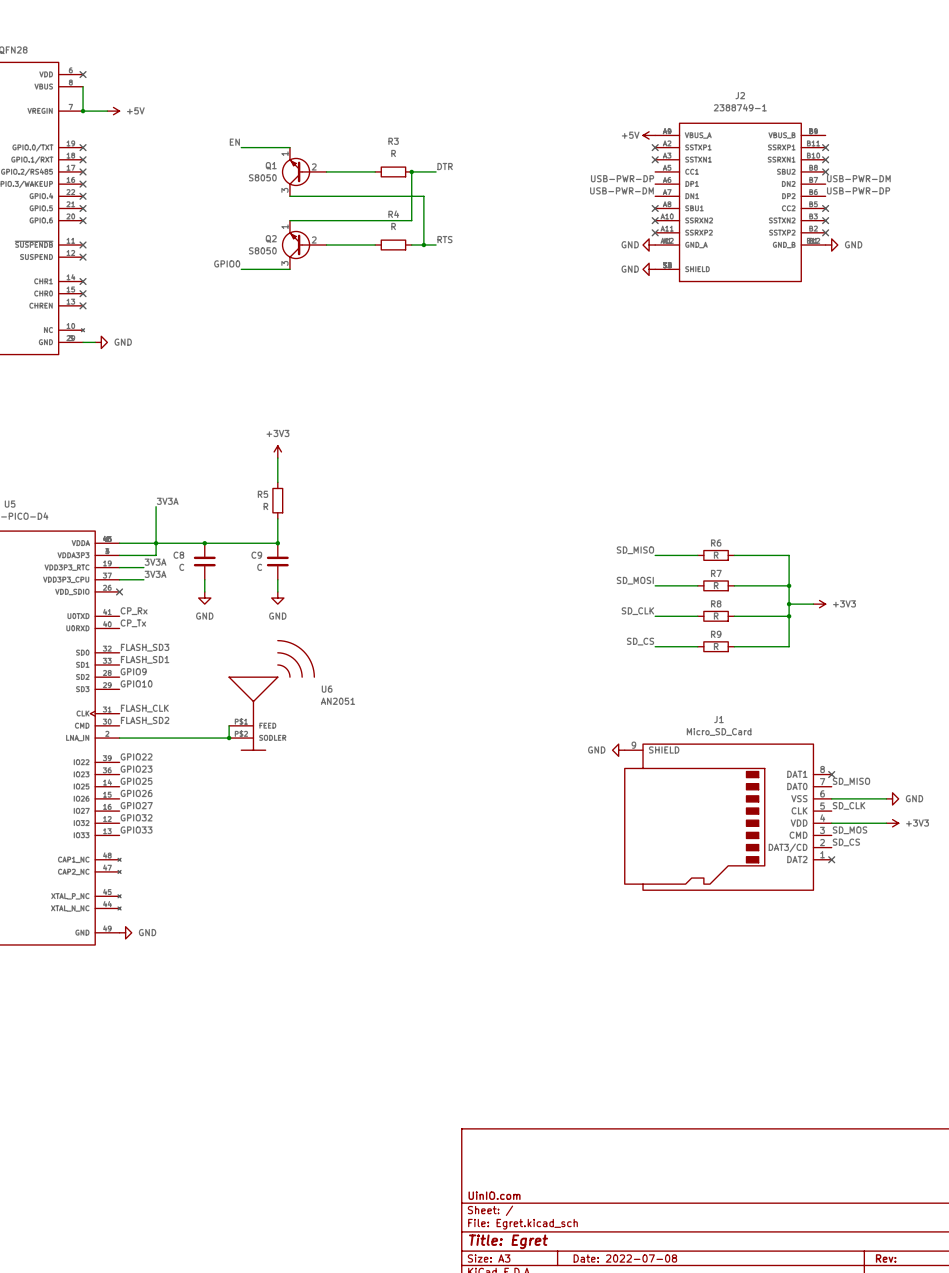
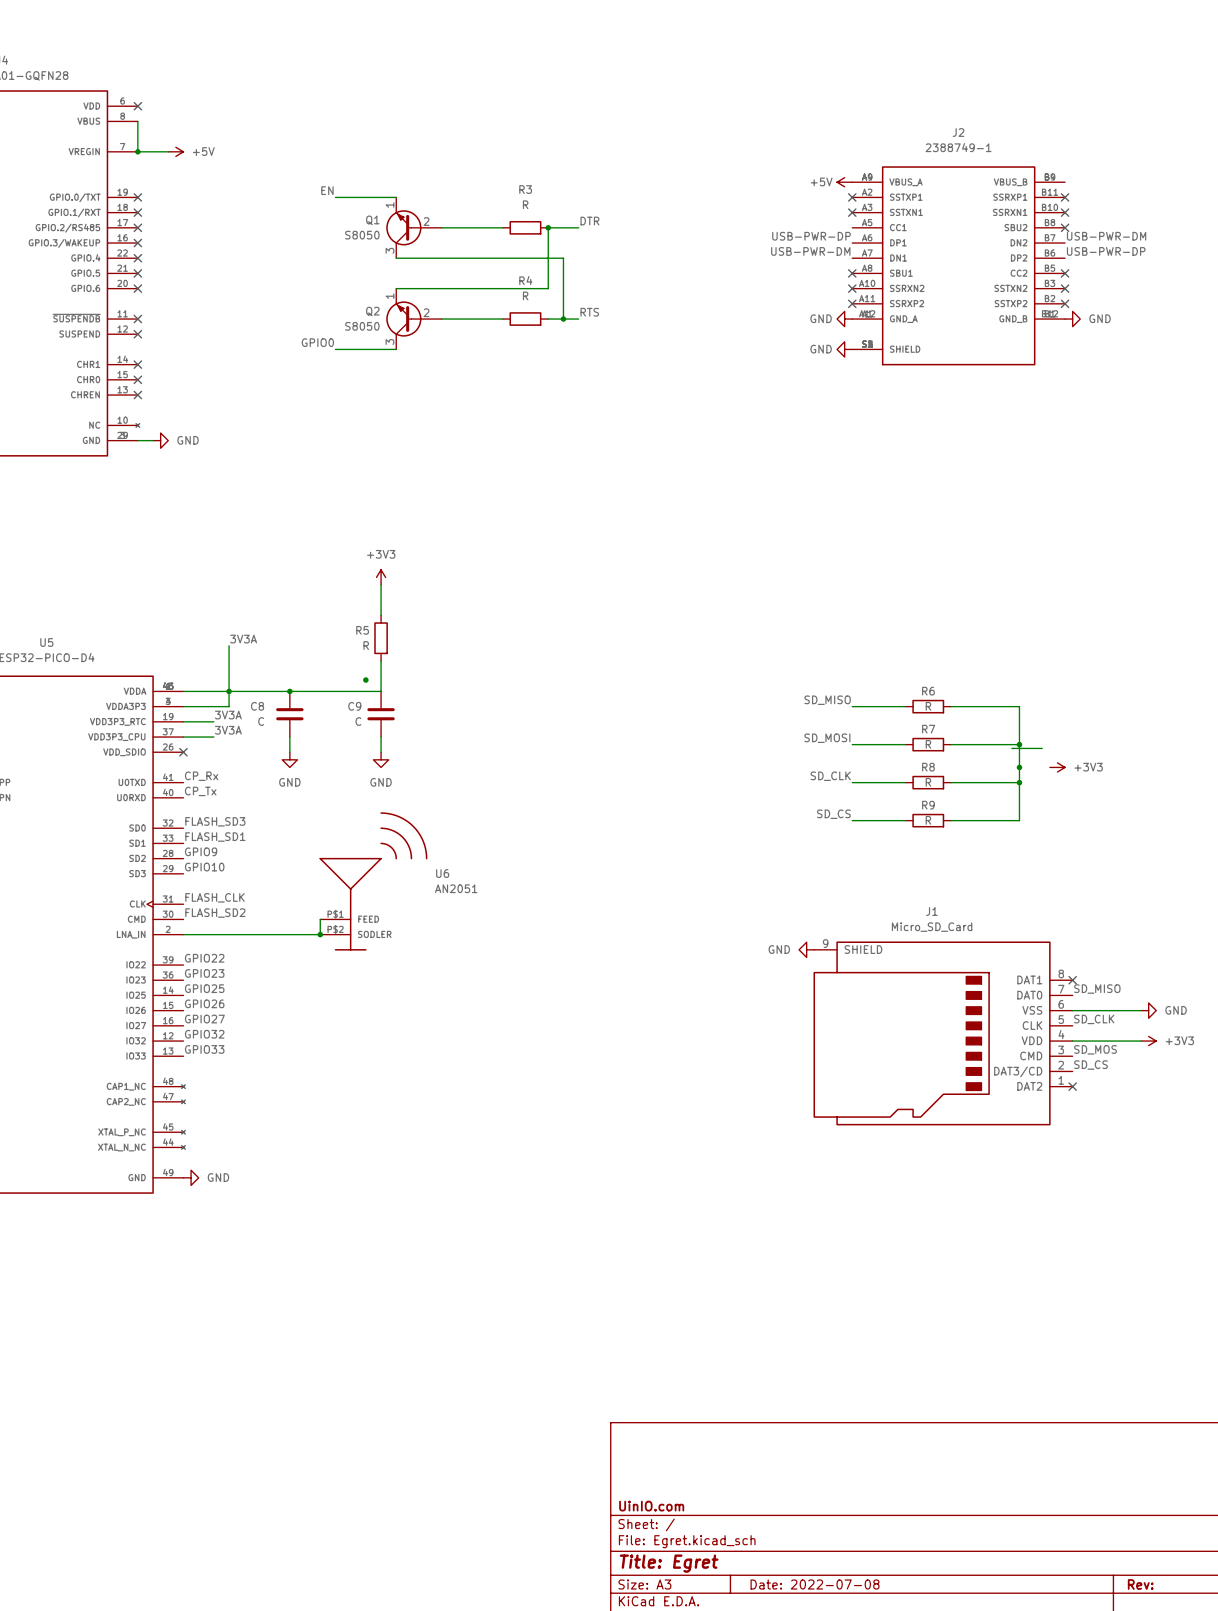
junction position: (277, 543) -> (365, 680)
wire: (789, 604) (813, 604) -> (1011, 748) (1042, 748)

